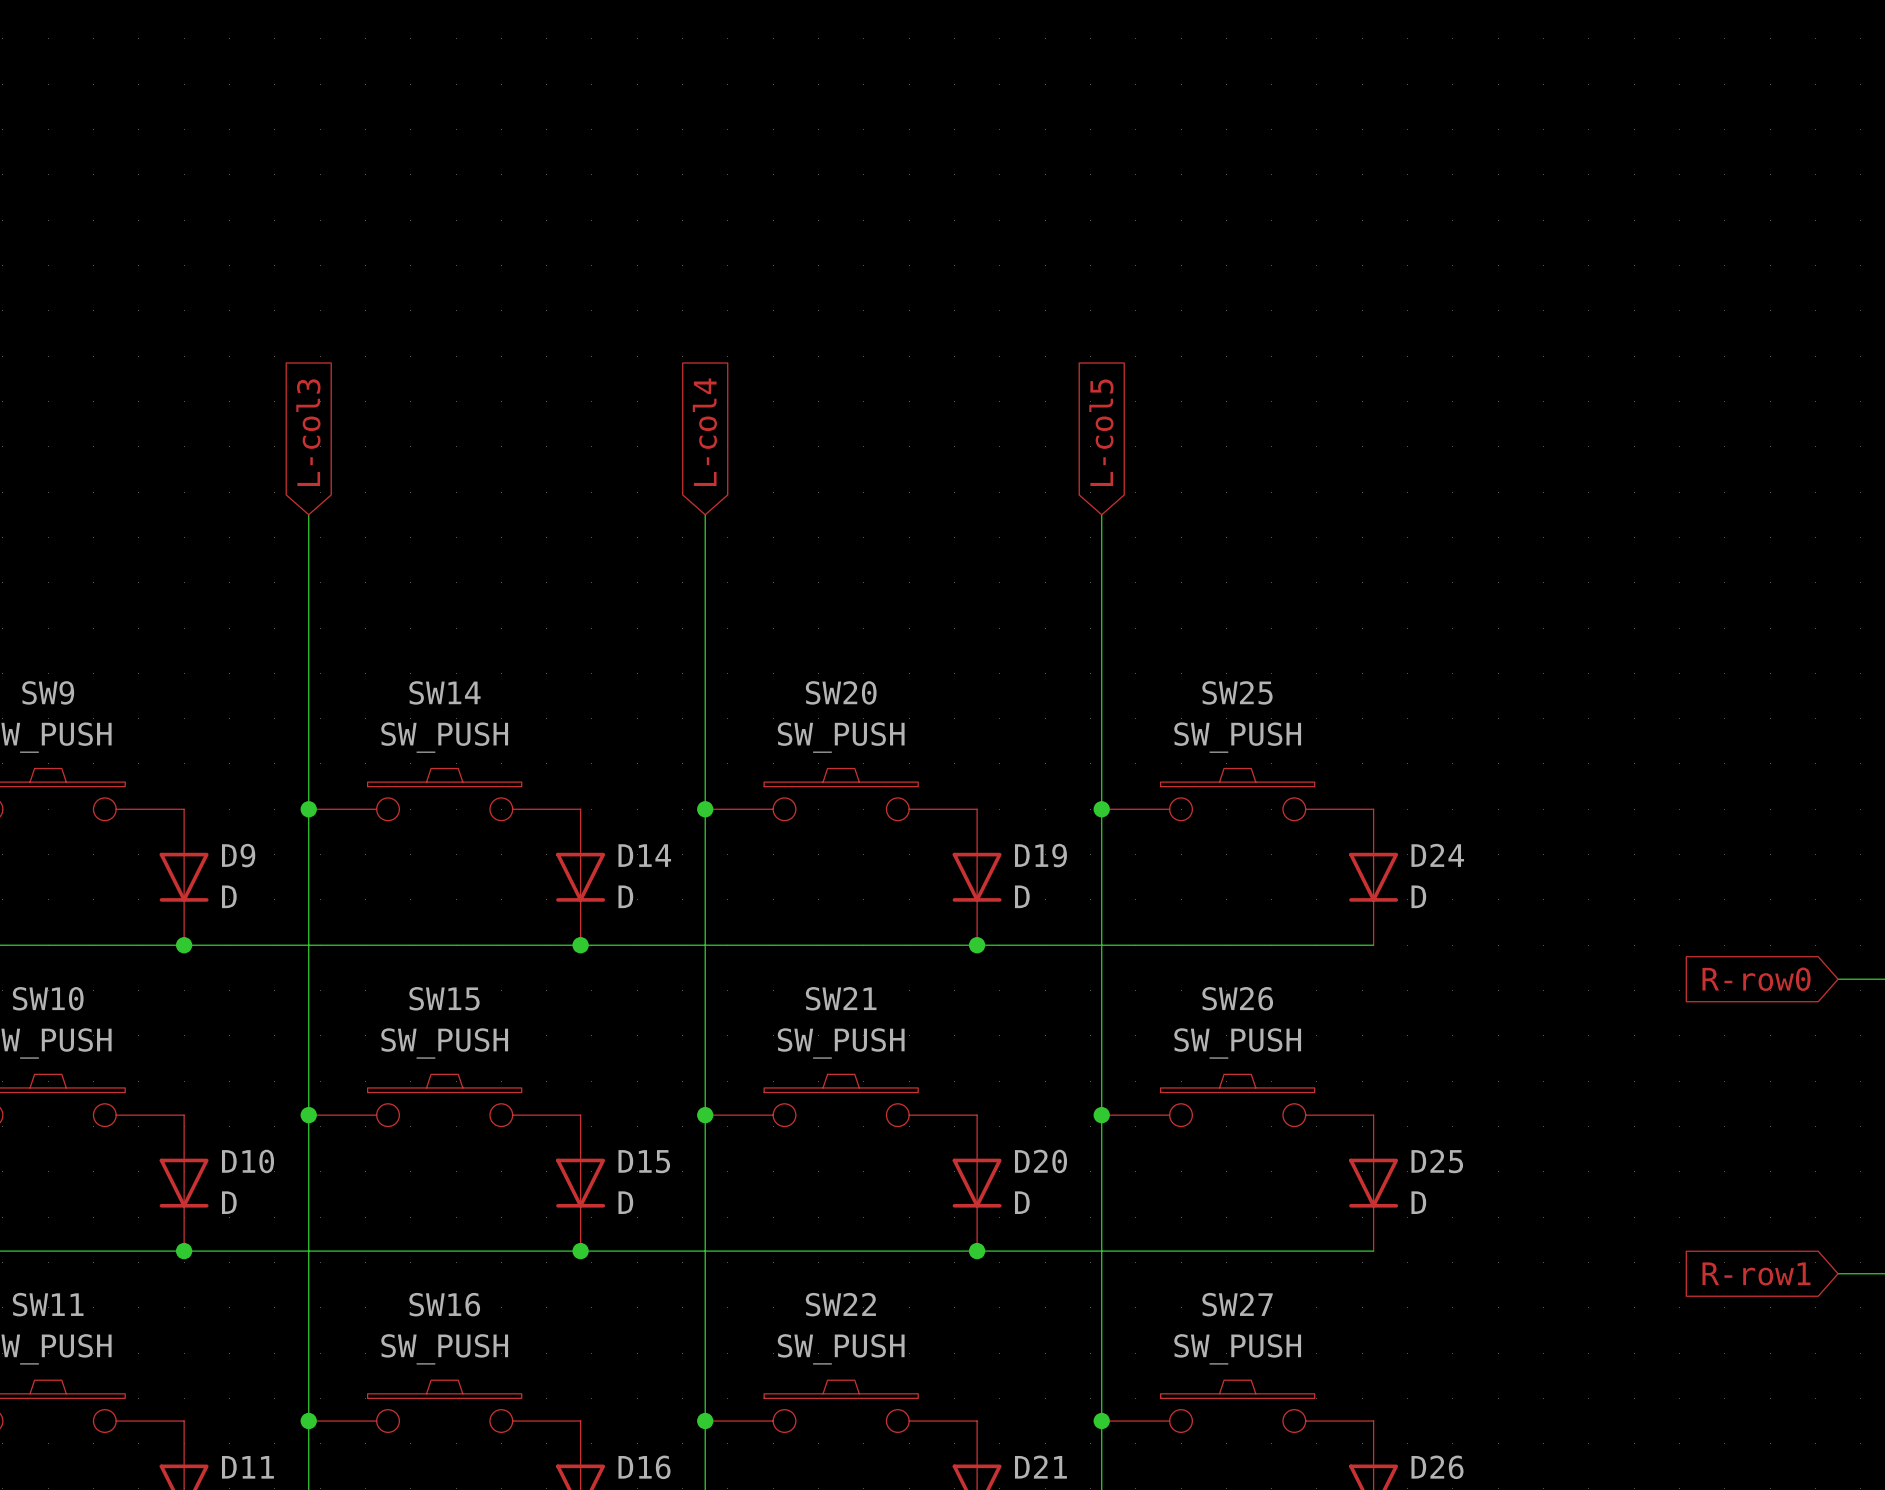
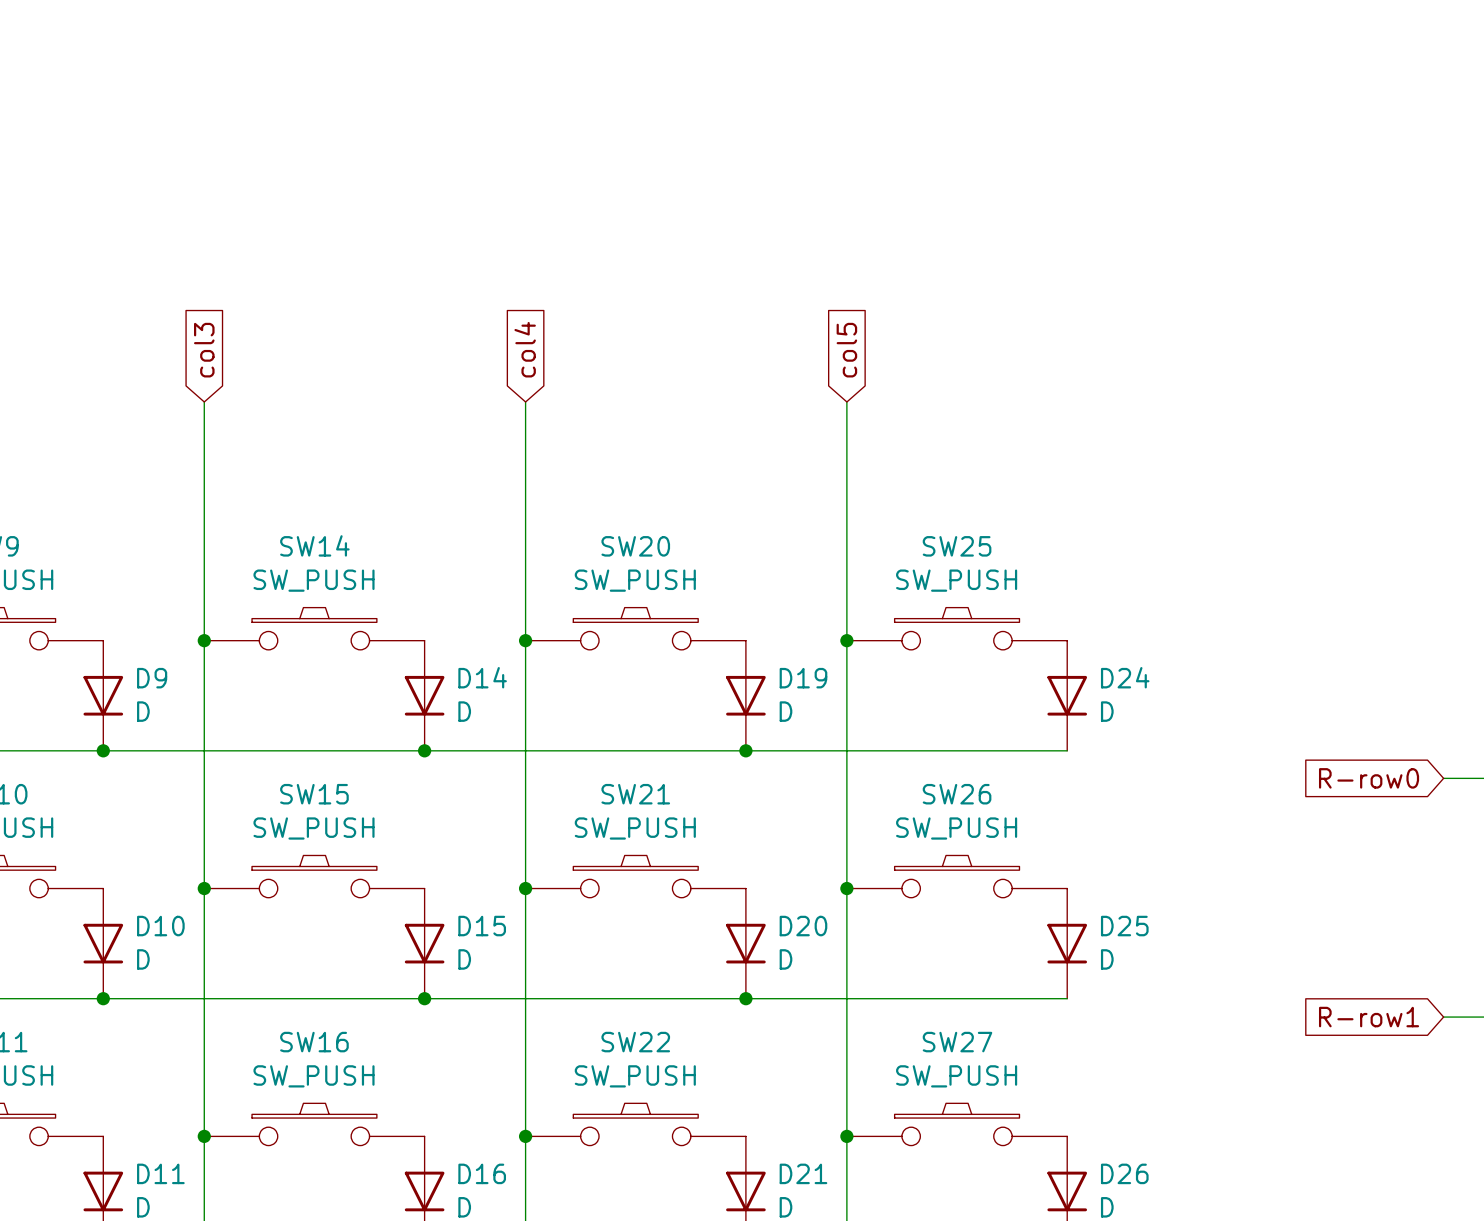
global label: L-col3 (308, 432) -> col3 (204, 350)
global label: L-col4 (704, 432) -> col4 (525, 349)
global label: L-col5 (1101, 432) -> col5 (846, 350)

